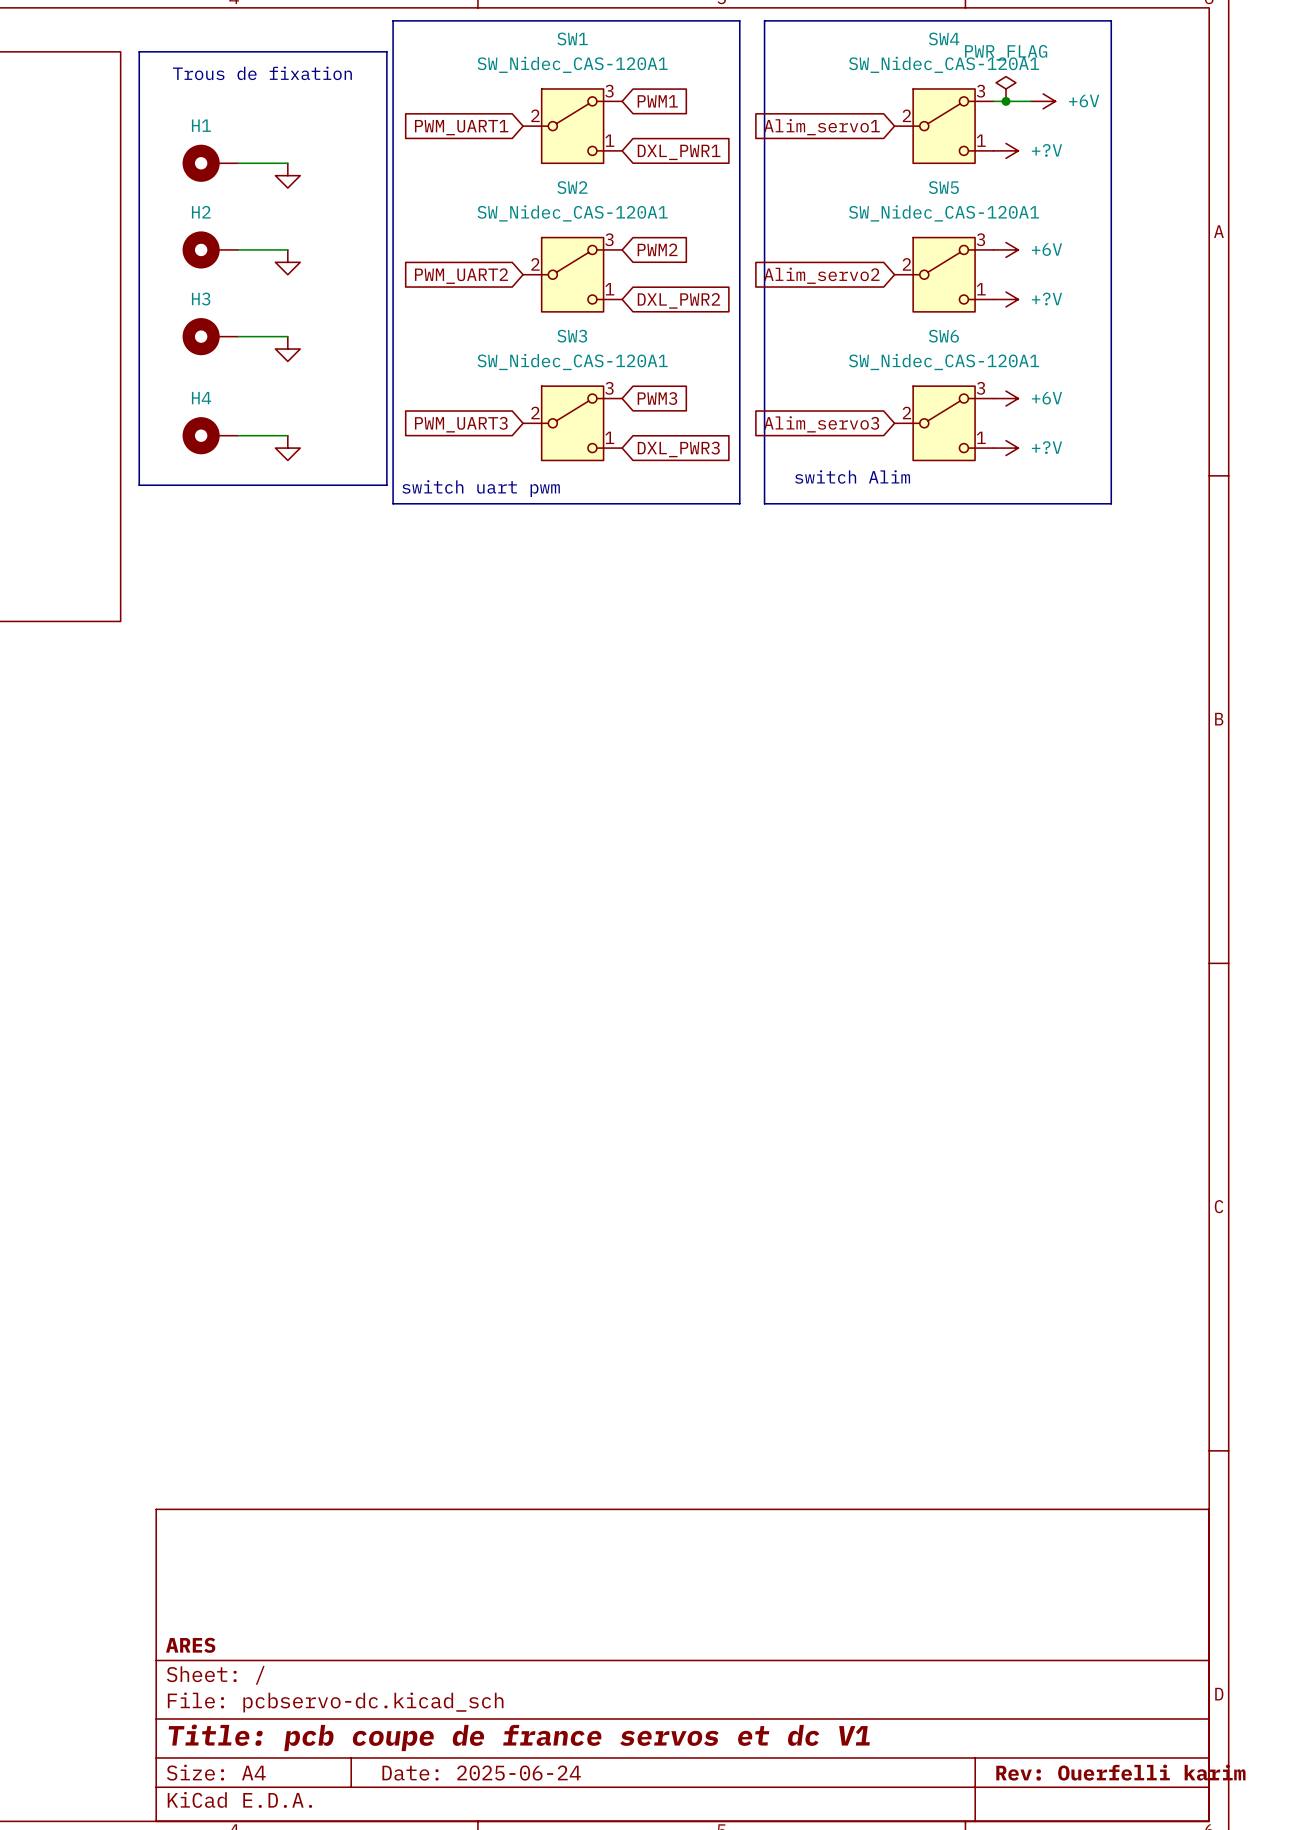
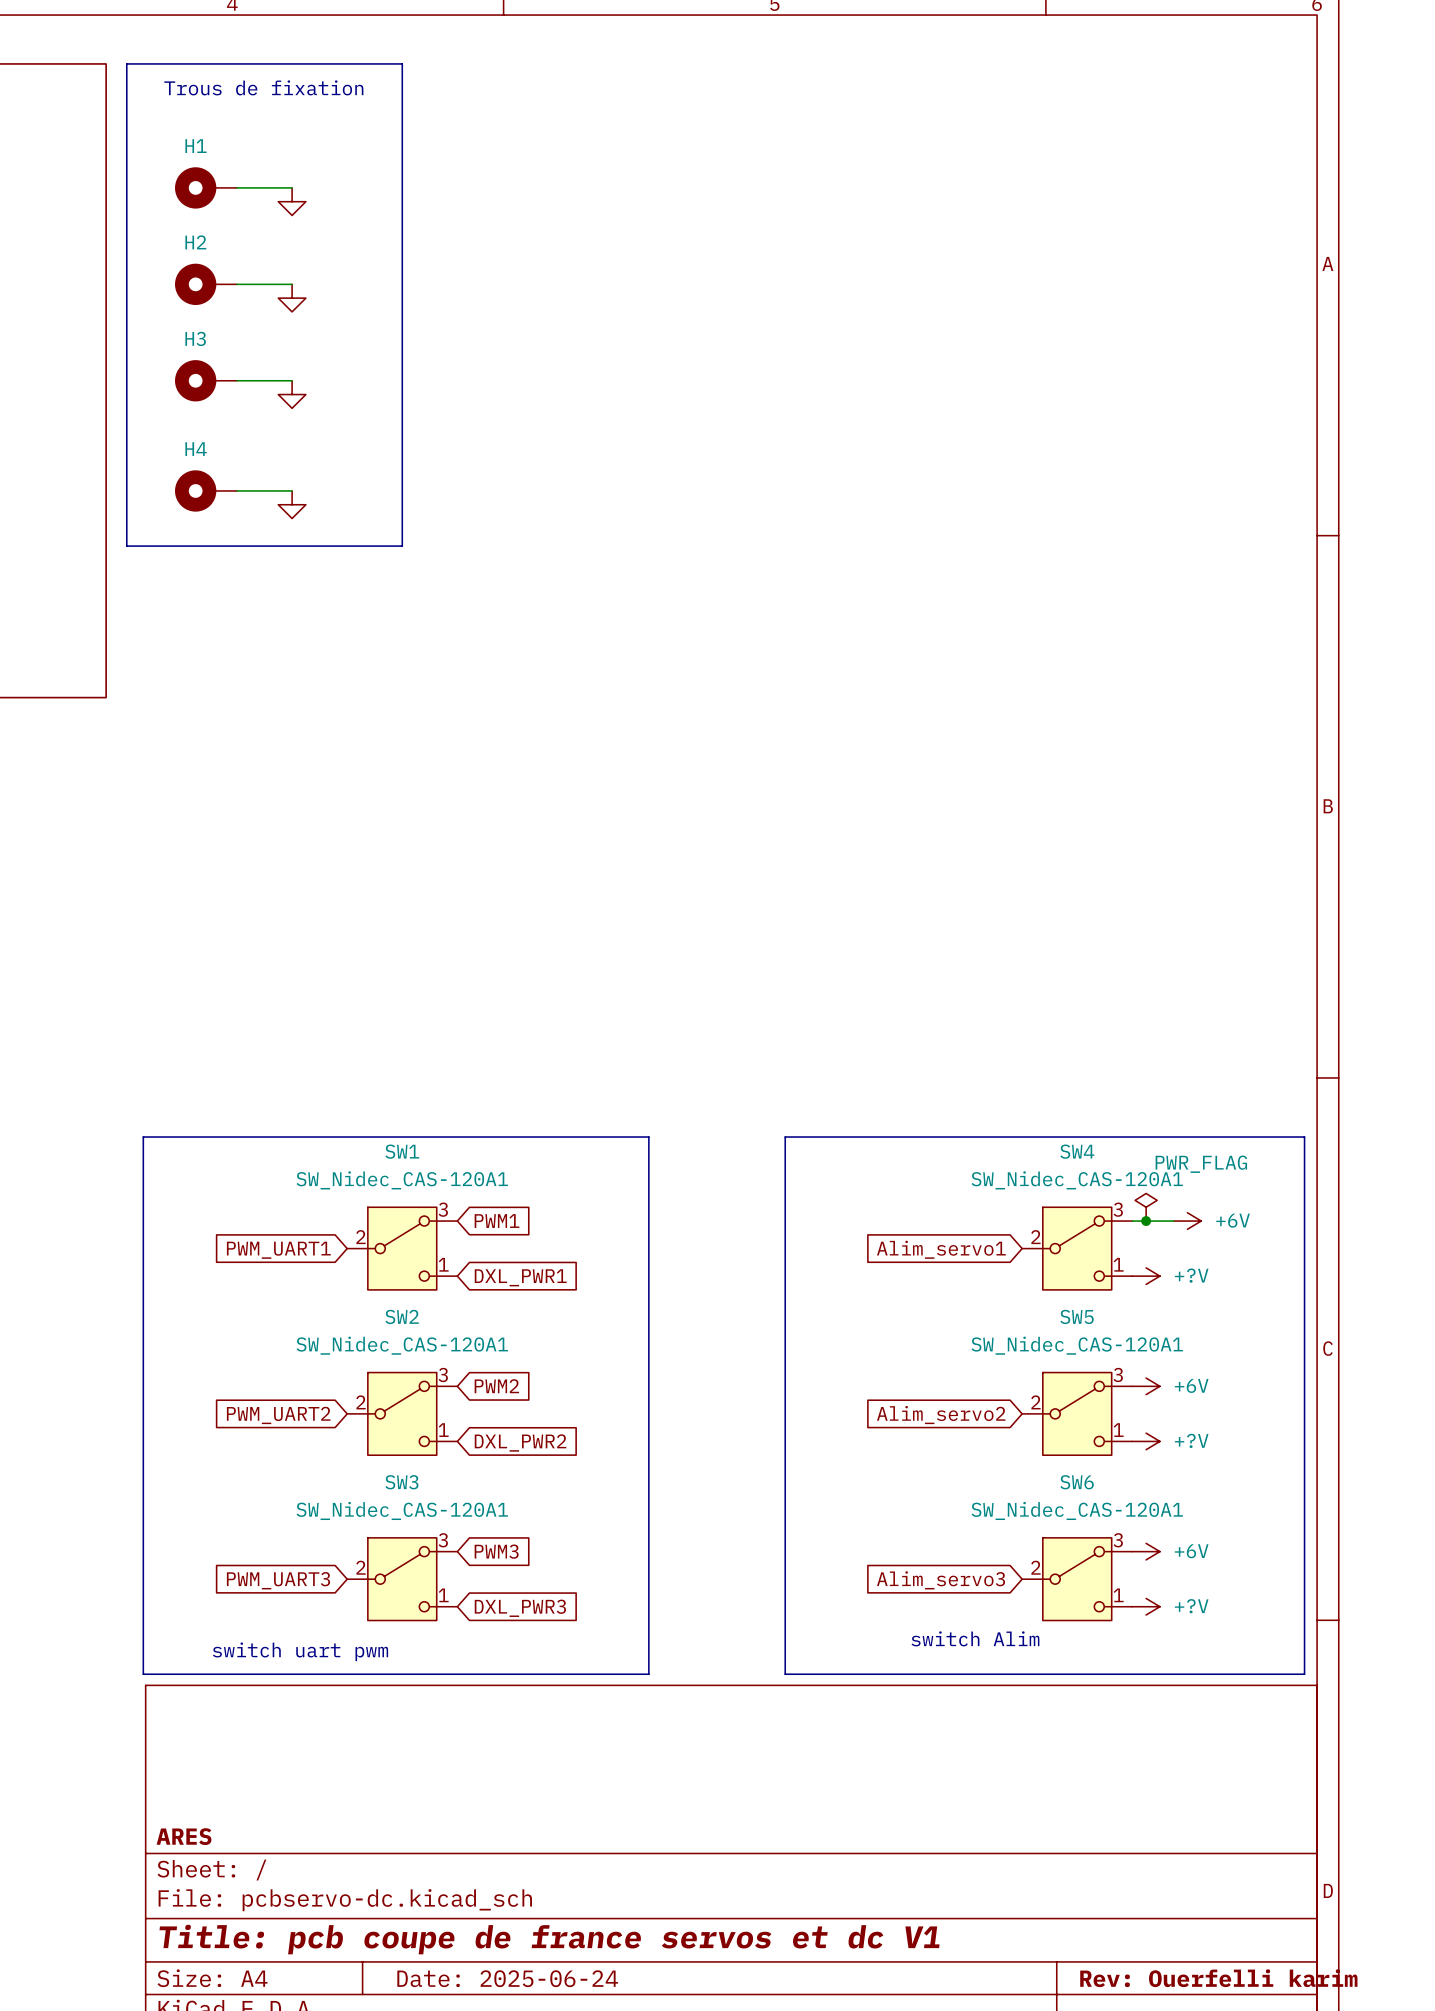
line: (393, 20) (739, 20) (739, 503) (393, 503) (393, 20) -> none
line: (764, 20) (1111, 20) (1111, 503) (764, 503) (764, 20) -> none
power symbol: PWR_FLAG (1006, 88) -> none
global label: PWM1 (657, 101) -> none
wire: (993, 101) (1030, 101) -> none
junction: (1006, 101) -> none
power symbol: +6V (1043, 101) -> none
SW1 position: (572, 126) -> (402, 1248)
SW4 position: (944, 126) -> (1077, 1248)
global label: PWM_UART1 (461, 127) -> none
global label: Alim_servo1 (821, 127) -> none
power symbol: +?V (1006, 150) -> none
global label: DXL_PWR1 (679, 152) -> none
global label: PWM2 (657, 249) -> none
power symbol: +6V (1006, 249) -> none
SW2 position: (572, 274) -> (402, 1413)
SW5 position: (944, 274) -> (1077, 1413)
global label: Alim_servo2 (821, 275) -> none
global label: PWM_UART2 (461, 276) -> none
power symbol: +?V (1006, 299) -> none
global label: DXL_PWR2 (678, 300) -> none
global label: PWM3 (657, 398) -> none
power symbol: +6V (1006, 398) -> none
SW3 position: (572, 423) -> (402, 1579)
SW6 position: (944, 423) -> (1077, 1579)
global label: PWM_UART3 (461, 424) -> none
global label: Alim_servo3 (821, 424) -> none
power symbol: +?V (1006, 448) -> none
global label: DXL_PWR3 (678, 449) -> none
text: switch Alim (852, 476) -> none
text: switch uart pwm (481, 488) -> none
line: none -> (143, 1137) (648, 1137) (648, 1674) (143, 1674) (143, 1137)
line: none -> (785, 1137) (1304, 1137) (1304, 1674) (785, 1674) (785, 1137)
power symbol: none -> PWR_FLAG (1146, 1207)
global label: none -> PWM1 (496, 1221)
wire: none -> (1132, 1221) (1173, 1221)
junction: none -> (1146, 1221)
power symbol: none -> +6V (1187, 1221)
global label: none -> Alim_servo1 (941, 1249)
global label: none -> PWM_UART1 (278, 1250)
power symbol: none -> +?V (1146, 1276)
global label: none -> DXL_PWR1 (520, 1277)
global label: none -> PWM2 (496, 1386)
power symbol: none -> +6V (1146, 1386)
global label: none -> PWM_UART2 (278, 1415)
global label: none -> Alim_servo2 (941, 1415)
power symbol: none -> +?V (1146, 1441)
global label: none -> DXL_PWR2 (520, 1442)
global label: none -> PWM3 (496, 1551)
power symbol: none -> +6V (1146, 1551)
global label: none -> Alim_servo3 (941, 1580)
global label: none -> PWM_UART3 (278, 1580)
power symbol: none -> +?V (1146, 1606)
global label: none -> DXL_PWR3 (520, 1608)
text: none -> switch Alim (975, 1638)
text: none -> switch uart pwm (300, 1651)

